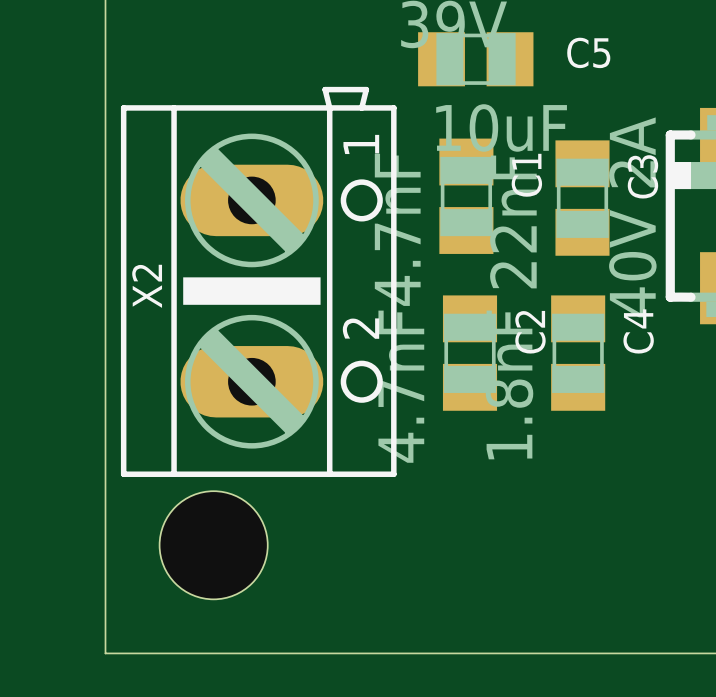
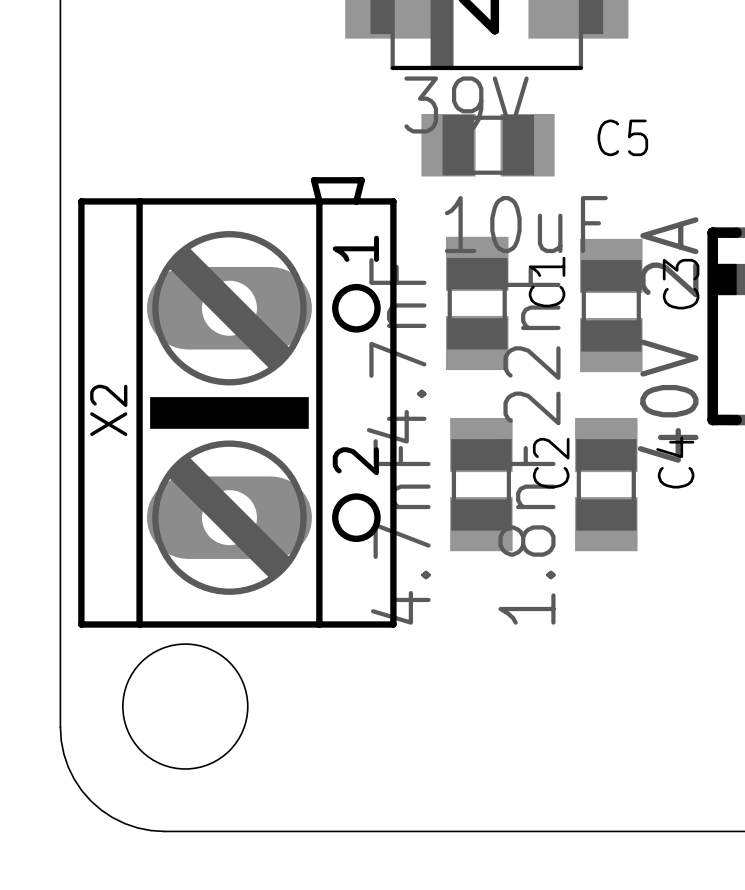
board edge: (105, 563) (105, 653) (195, 653) -> (60, 727) (61, 740) (68, 767) (74, 779) (90, 800) (112, 817) (124, 823) (150, 830) (164, 831)

